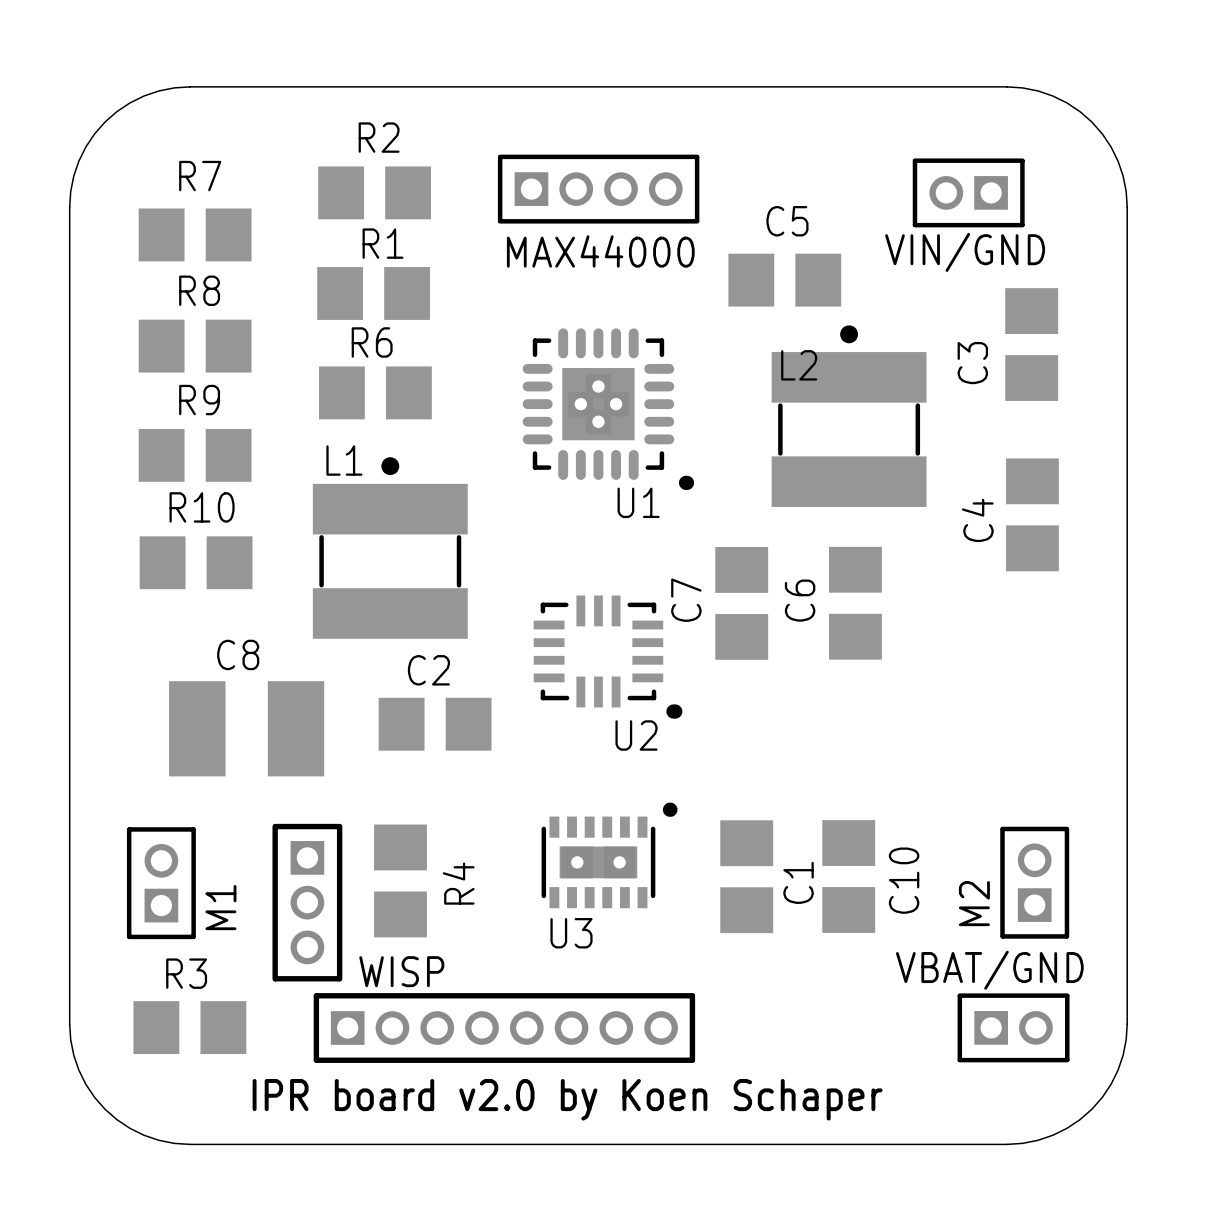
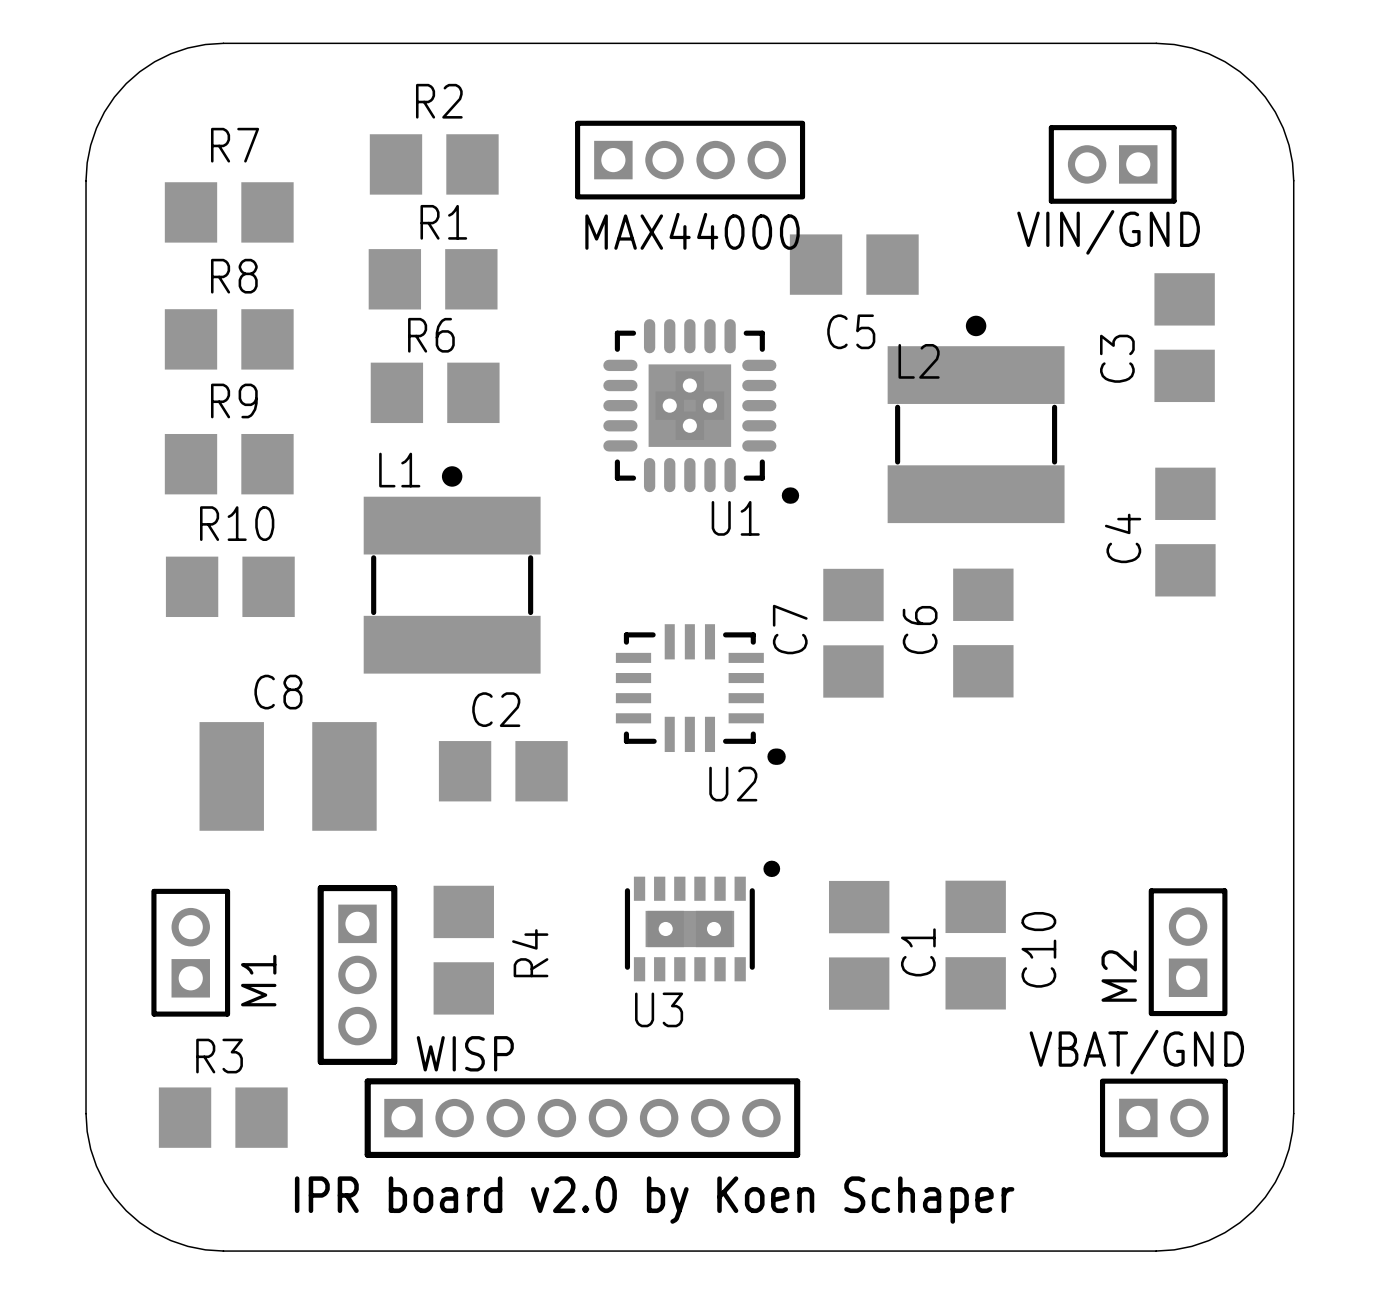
C5 name position: C5 (787, 221) -> C5 (851, 331)
C5 position: (784, 280) -> (854, 264)

